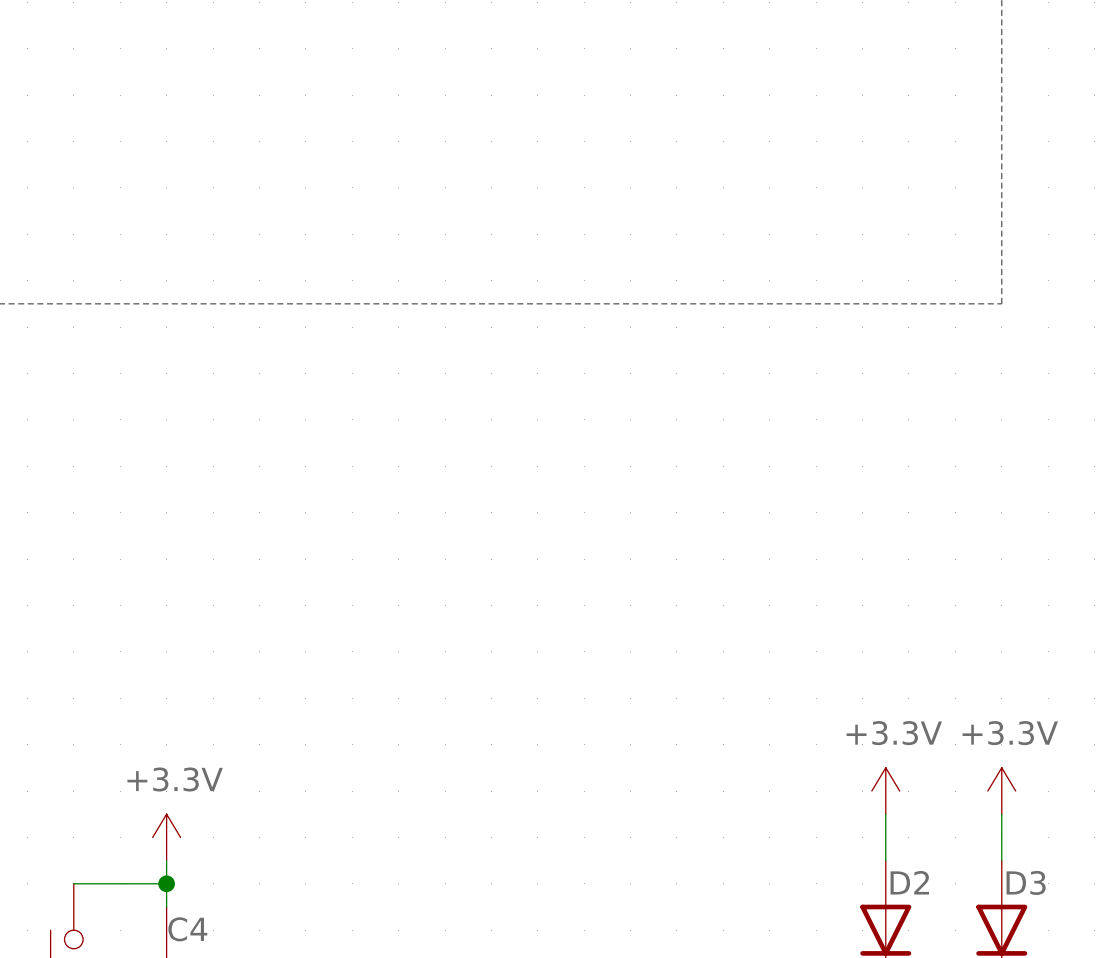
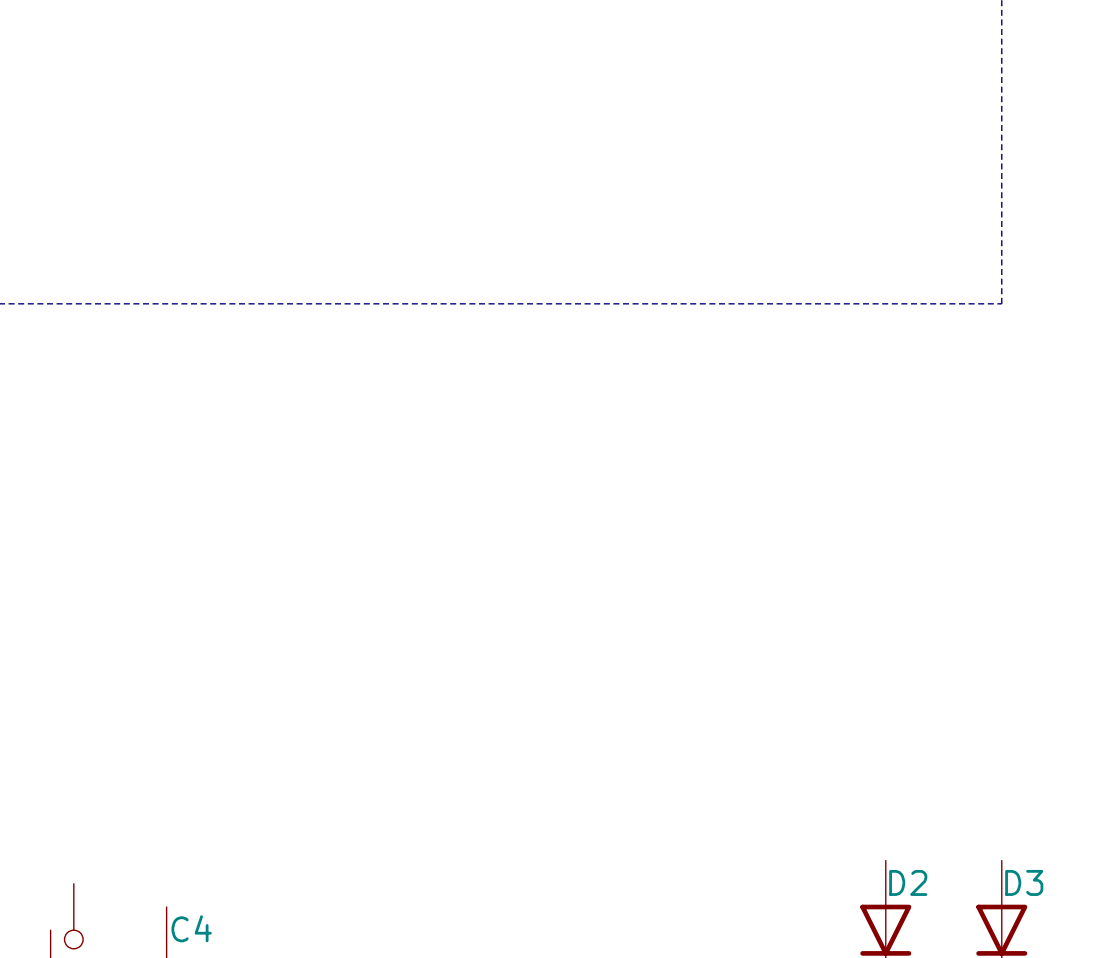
power symbol: +3.3V (885, 791) -> none
power symbol: +3.3V (1001, 791) -> none
wire: (885, 814) (885, 860) -> none
wire: (1001, 814) (1001, 860) -> none
power symbol: +3.3V (166, 837) -> none
wire: (166, 860) (166, 907) -> none
wire: (73, 883) (166, 883) -> none
junction: (166, 883) -> none

